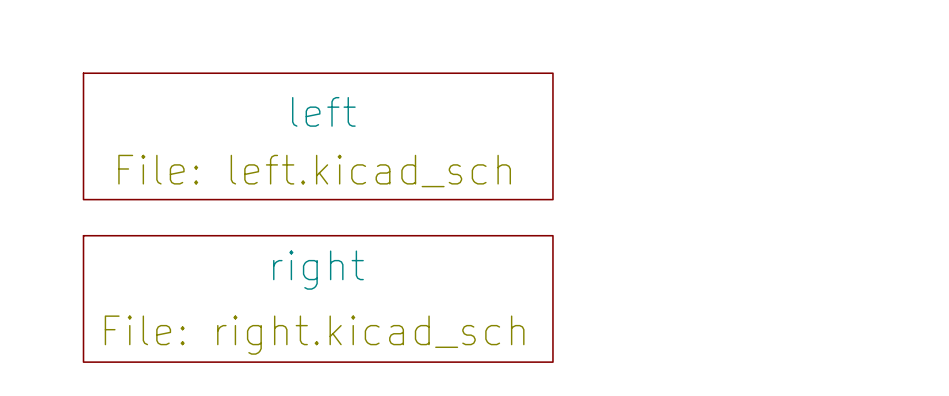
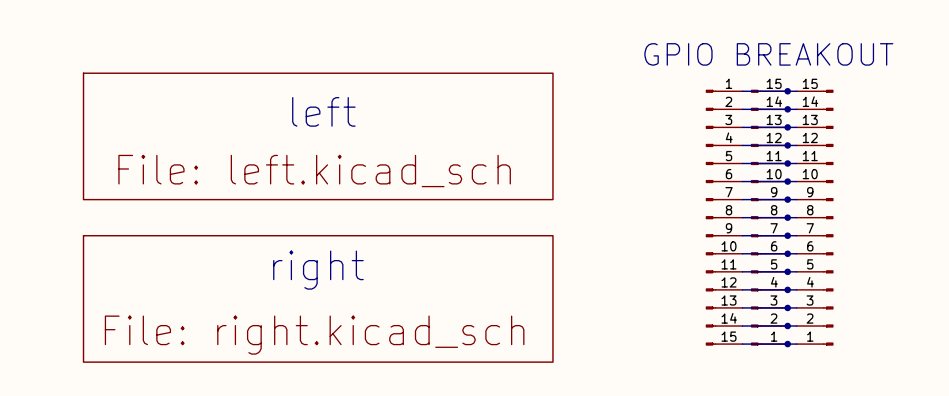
text: none -> GPIO BREAKOUT (768, 54)
wire: none -> (742, 91) (796, 91)
junction: none -> (787, 91)
wire: none -> (742, 109) (796, 109)
junction: none -> (787, 109)
wire: none -> (742, 127) (796, 127)
junction: none -> (787, 127)
wire: none -> (742, 145) (796, 145)
junction: none -> (787, 145)
wire: none -> (742, 163) (796, 163)
junction: none -> (787, 163)
wire: none -> (742, 181) (796, 181)
junction: none -> (787, 181)
wire: none -> (742, 199) (796, 199)
junction: none -> (787, 199)
part: none -> (724, 217)
wire: none -> (742, 217) (796, 217)
part: none -> (769, 217)
junction: none -> (787, 217)
part: none -> (815, 217)
wire: none -> (742, 235) (796, 235)
junction: none -> (787, 235)
wire: none -> (742, 253) (796, 253)
junction: none -> (787, 253)
wire: none -> (742, 271) (796, 271)
junction: none -> (787, 271)
wire: none -> (742, 289) (796, 289)
junction: none -> (787, 289)
wire: none -> (742, 307) (796, 307)
junction: none -> (787, 307)
wire: none -> (742, 326) (796, 326)
junction: none -> (787, 326)
wire: none -> (742, 344) (796, 344)
junction: none -> (787, 344)

